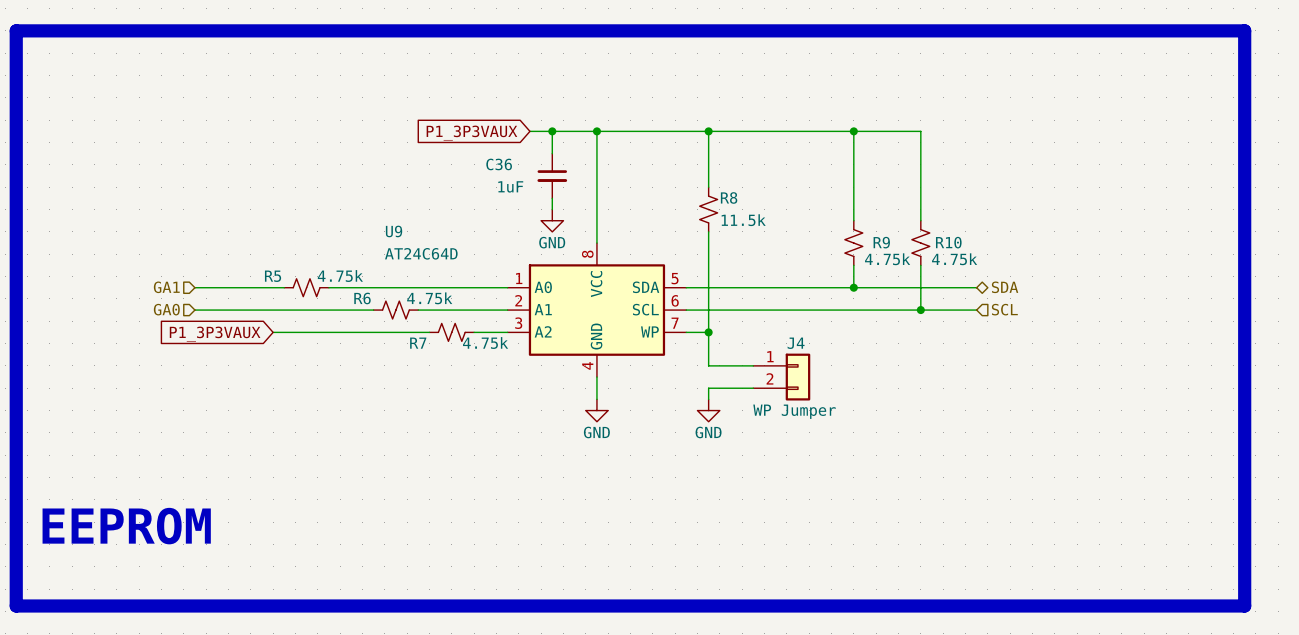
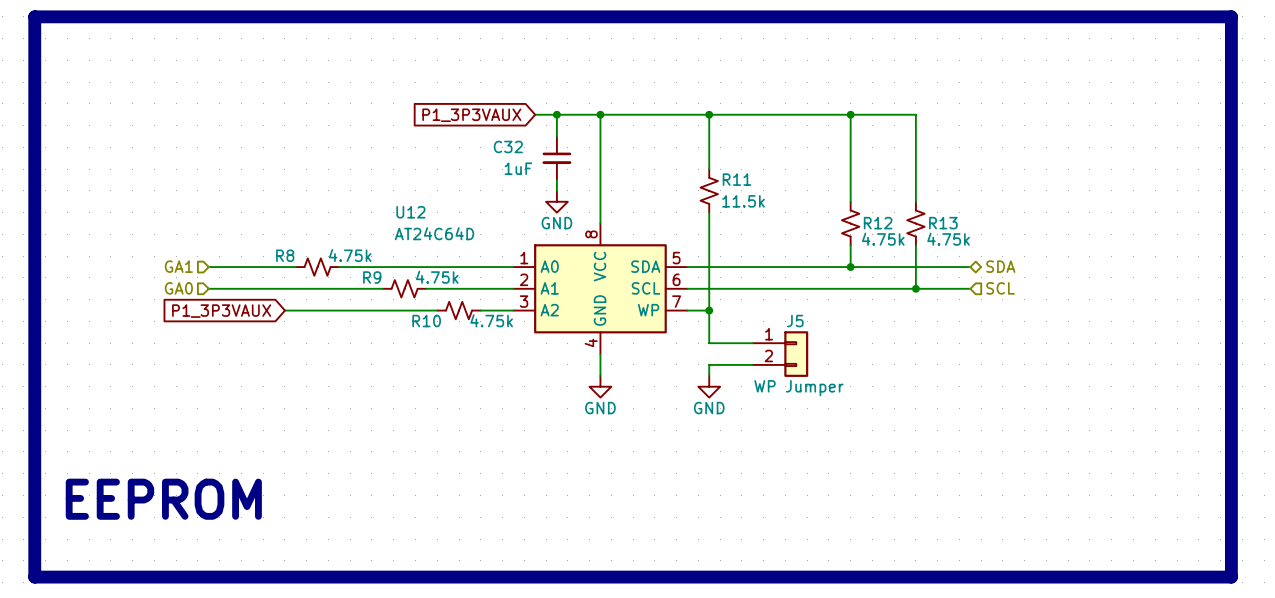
C36 name: C36 (499, 164) -> C32 (508, 146)
R8 name: R8 (729, 197) -> R11 (737, 179)
U9 name: U9 (394, 231) -> U12 (410, 212)
R9 name: R9 (881, 242) -> R12 (878, 223)
R10 name: R10 (948, 242) -> R13 (943, 223)
R5 name: R5 (273, 276) -> R8 (285, 255)
R6 name: R6 (362, 298) -> R9 (372, 277)
R7 name: R7 (418, 343) -> R10 (426, 321)
J4 name: J4 (796, 343) -> J5 (795, 321)

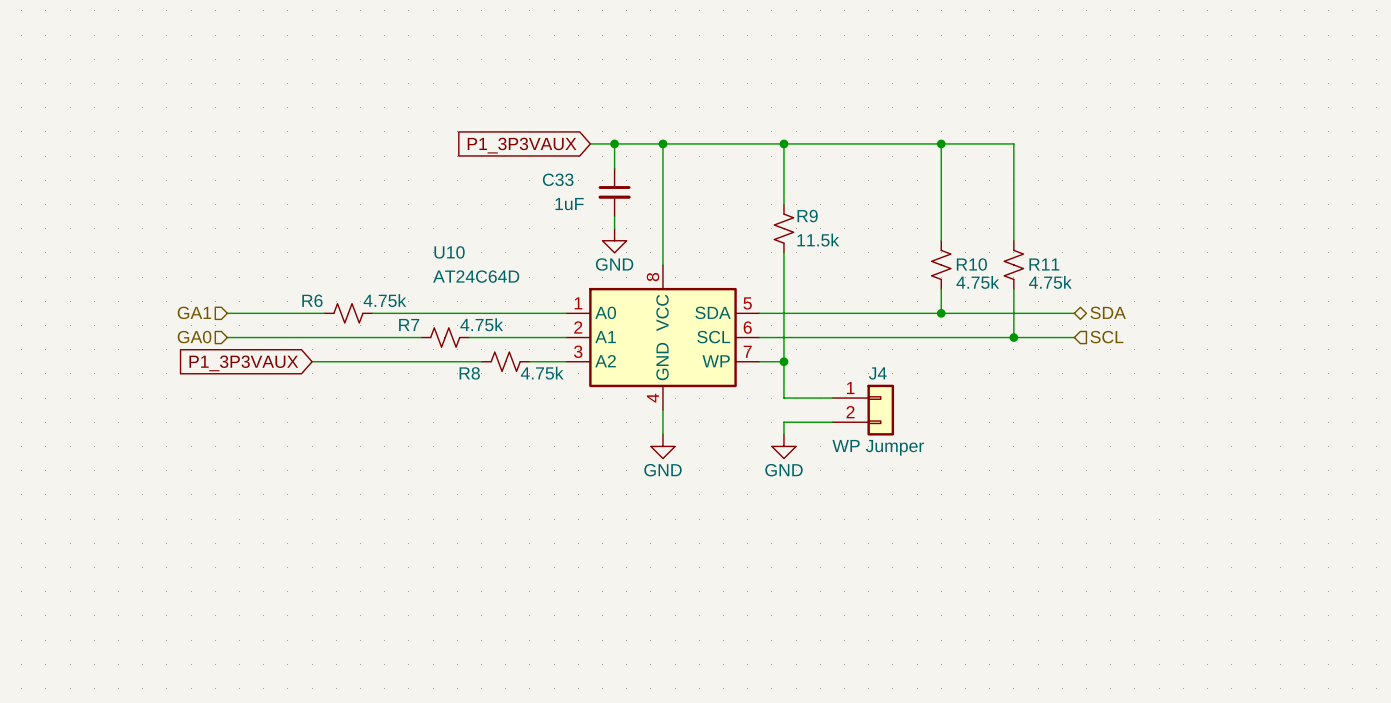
line: (34, 16) (1231, 16) (1231, 577) (34, 577) (34, 16) -> none
C32 name: C32 (508, 146) -> C33 (558, 179)
R11 name: R11 (737, 179) -> R9 (807, 216)
U12 name: U12 (410, 212) -> U10 (449, 252)
R12 name: R12 (878, 223) -> R10 (971, 264)
R13 name: R13 (943, 223) -> R11 (1044, 264)
R8 name: R8 (285, 255) -> R6 (312, 300)
R9 name: R9 (372, 277) -> R7 (409, 324)
R10 name: R10 (426, 321) -> R8 (469, 373)
J5 name: J5 (795, 321) -> J4 (877, 373)
text: EEPROM (163, 499) -> none

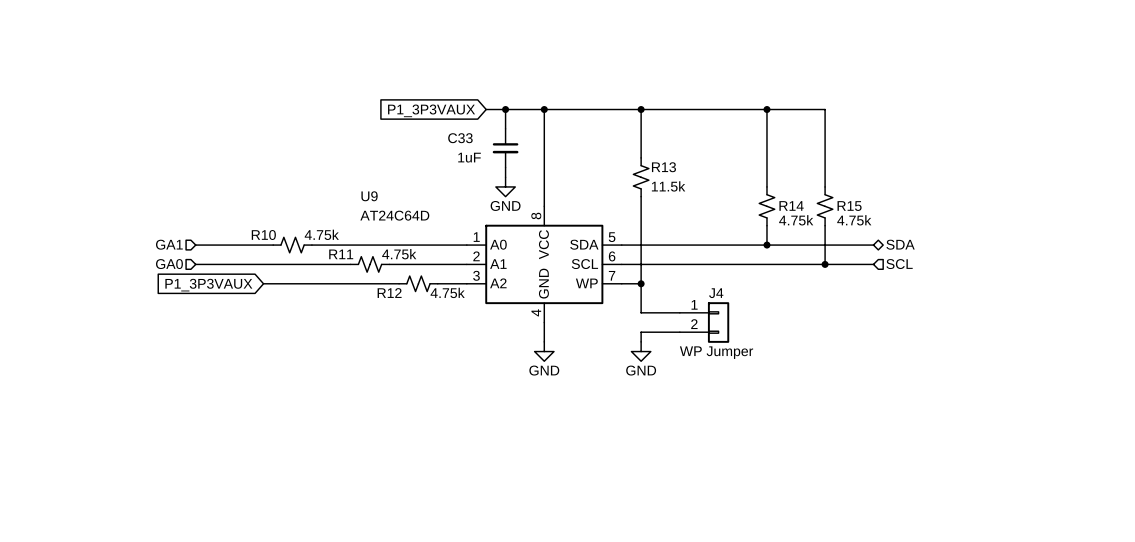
R9 name: R9 (807, 216) -> R13 (663, 167)
U10 name: U10 (449, 252) -> U9 (369, 196)
R10 name: R10 (971, 264) -> R14 (791, 205)
R11 name: R11 (1044, 264) -> R15 (849, 206)
R6 name: R6 (312, 300) -> R10 (263, 235)
R7 name: R7 (409, 324) -> R11 (341, 254)
R8 name: R8 (469, 373) -> R12 (389, 293)

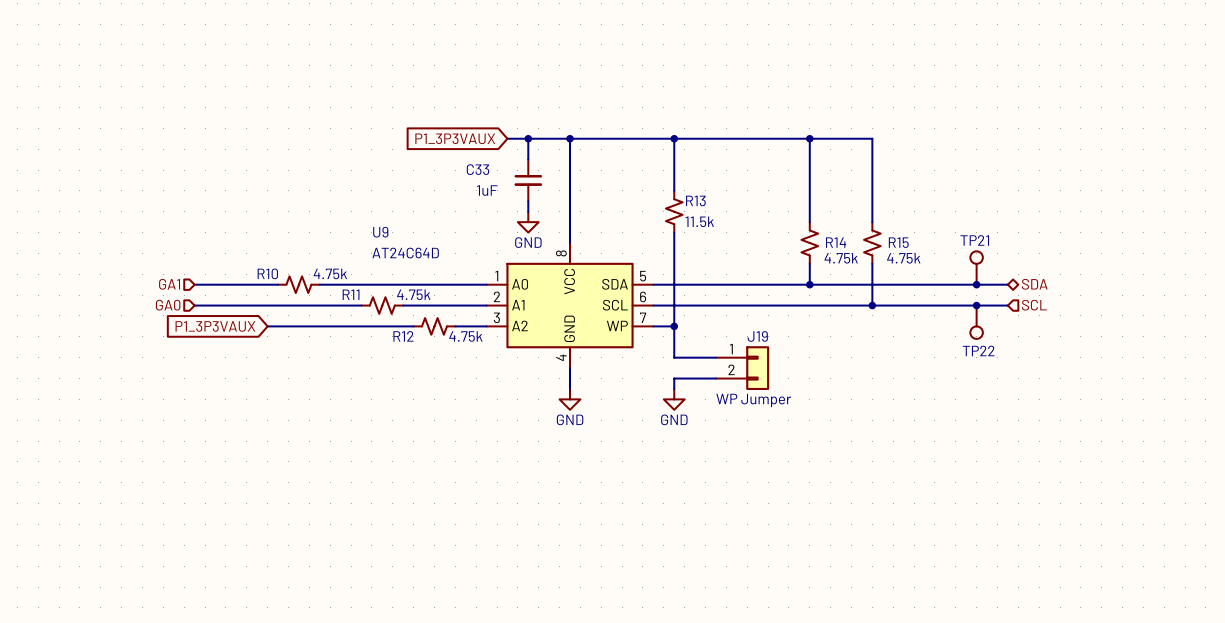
TP21: none -> (976, 268)
hierarchical label position: SDA (900, 244) -> SDA (1034, 284)
wire: none -> (924, 284) (1007, 284)
junction: none -> (976, 284)
wire: none -> (924, 305) (1007, 305)
hierarchical label position: SCL (899, 264) -> SCL (1034, 305)
junction: none -> (976, 305)
TP22: none -> (976, 322)
J4 name: J4 (716, 293) -> J19 (757, 336)

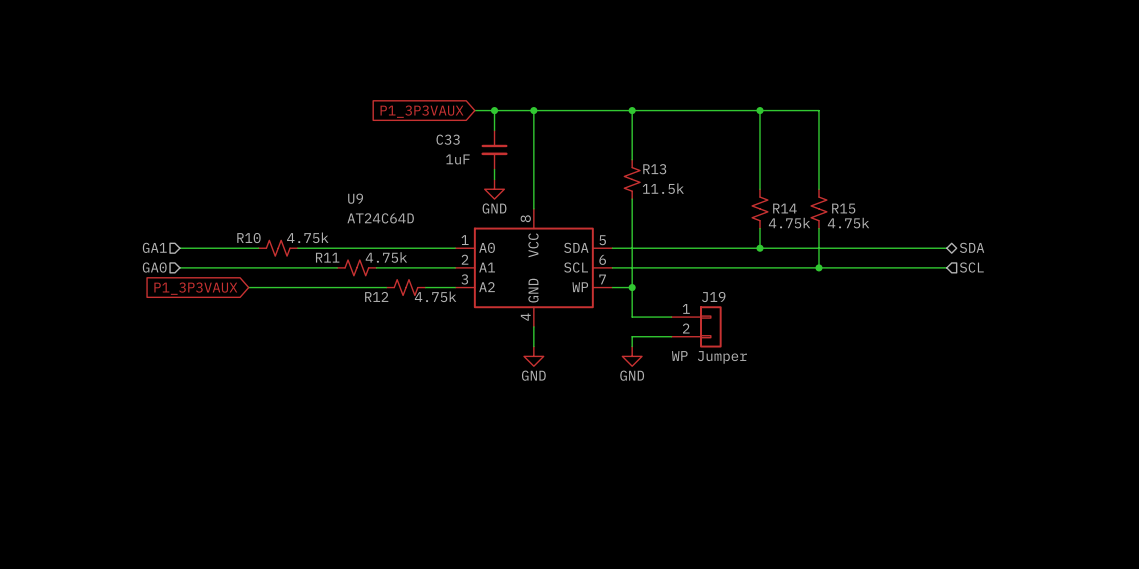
TP21: (976, 268) -> none
junction: (976, 284) -> none
junction: (976, 305) -> none
TP22: (976, 322) -> none

